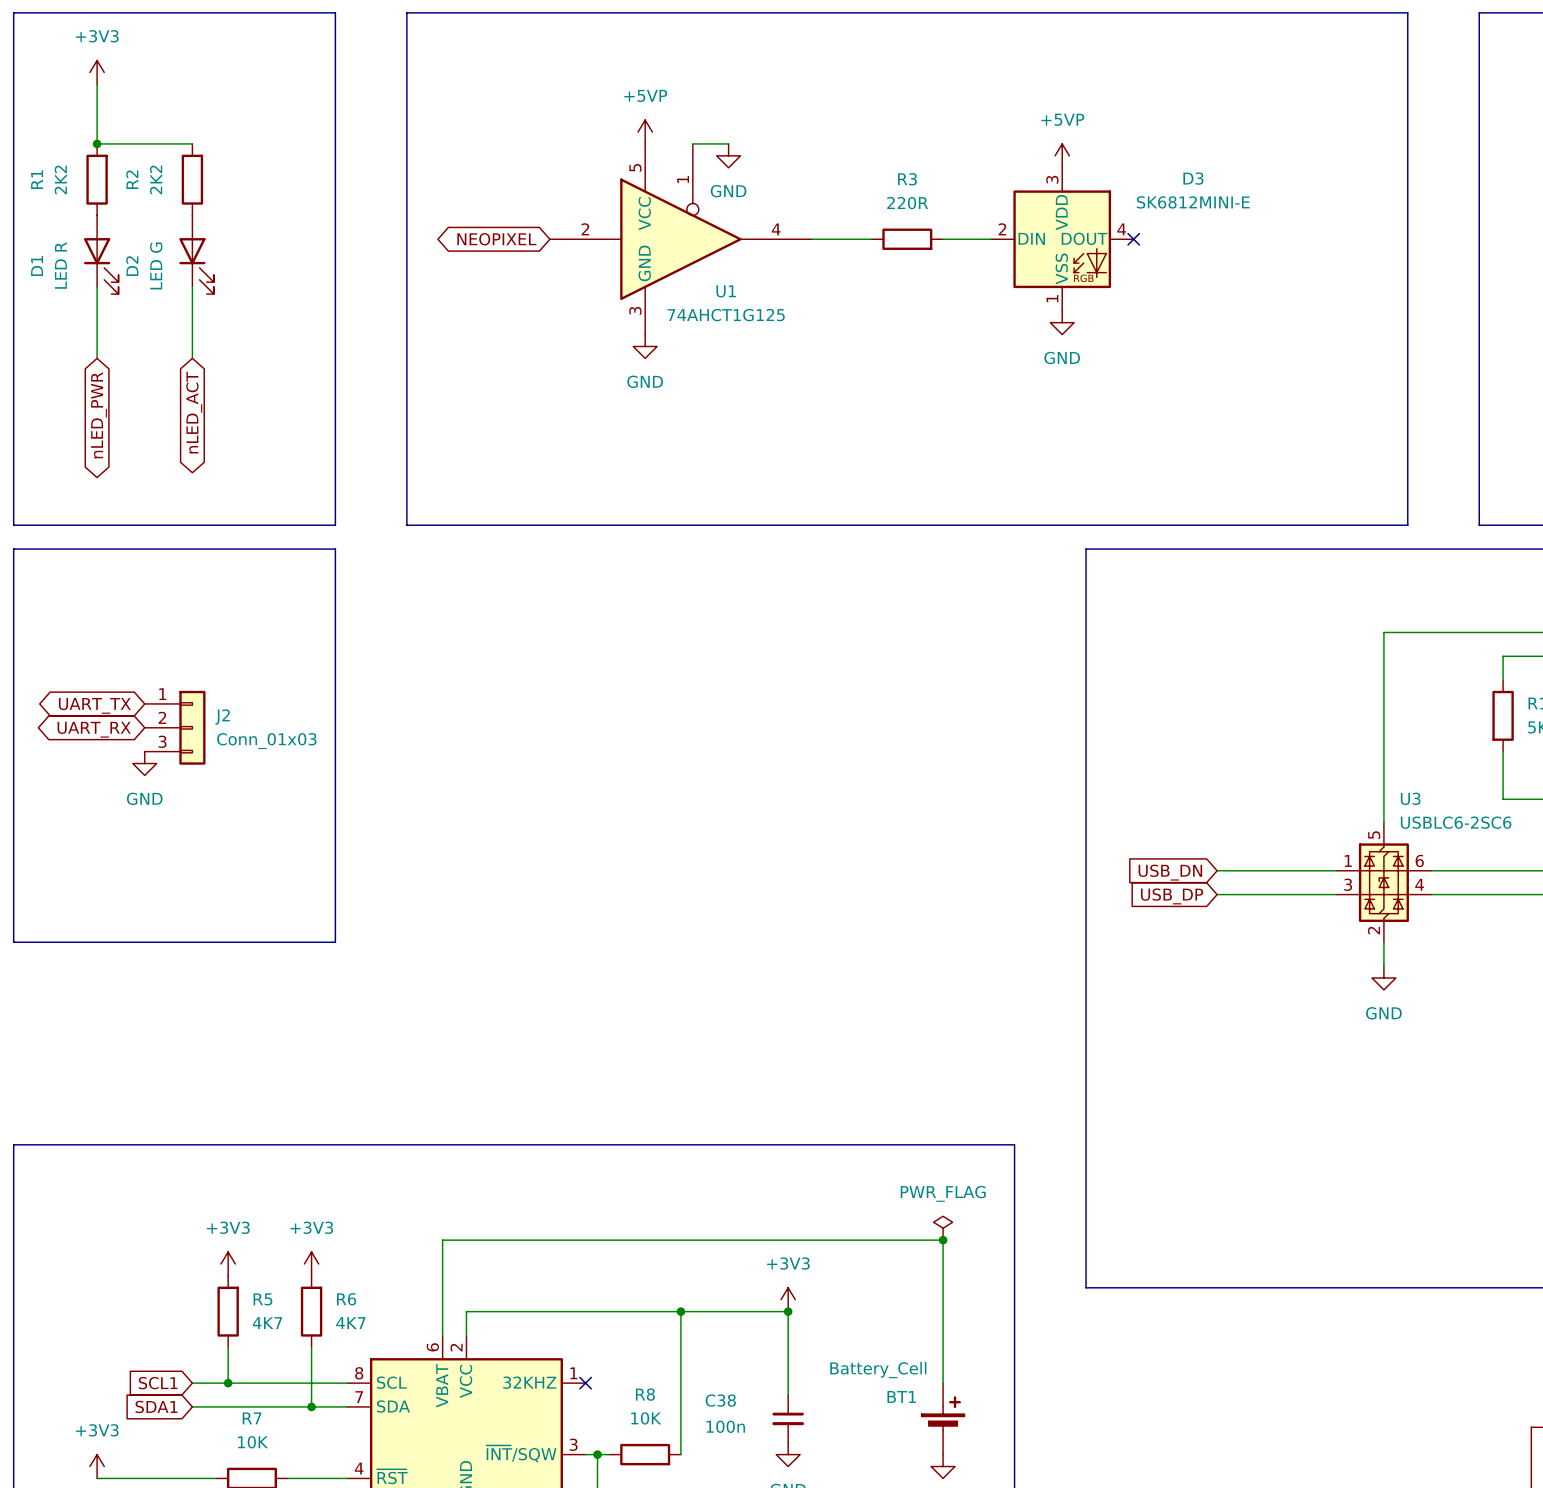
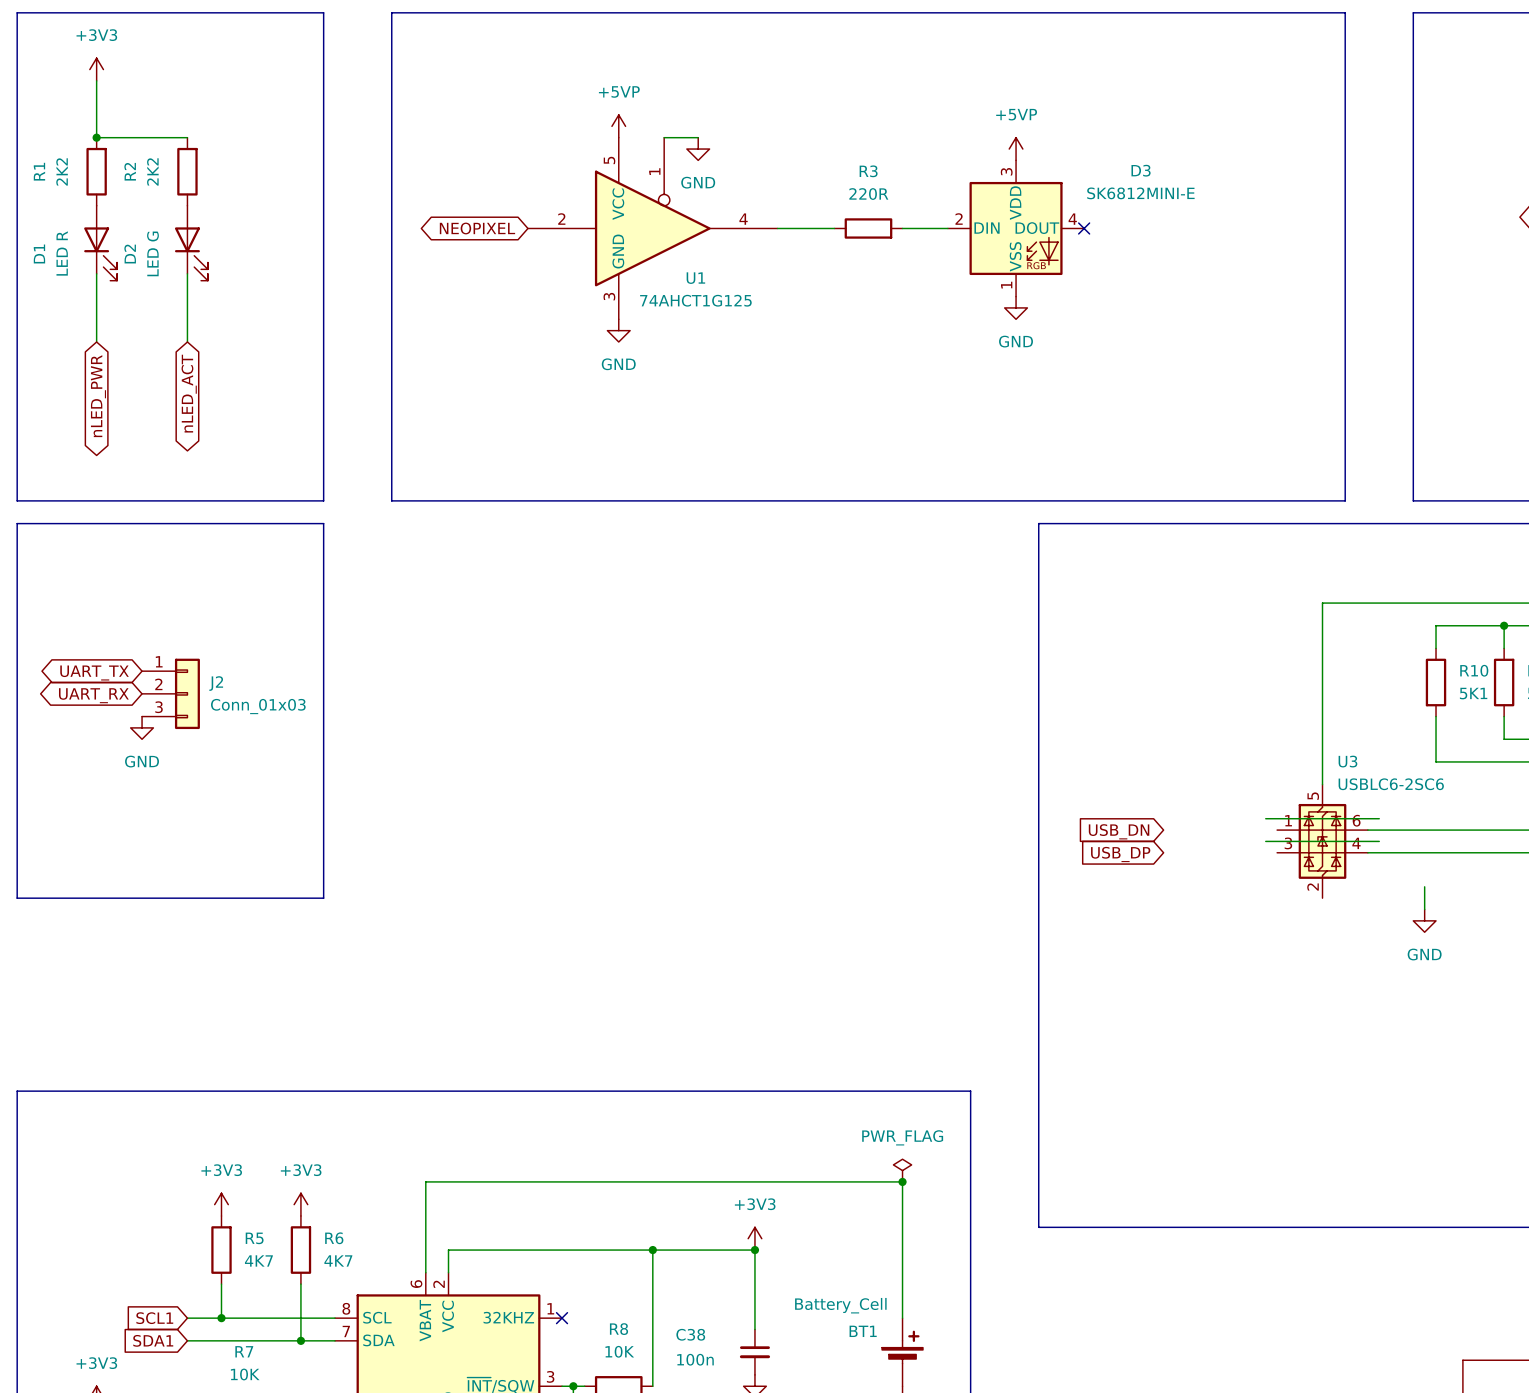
wire: (1217, 870) (1336, 870) -> (1265, 818) (1379, 818)
wire: (1217, 894) (1336, 894) -> (1265, 841) (1379, 841)
wire: (1383, 942) (1383, 966) -> (1424, 886) (1424, 909)
power symbol position: GND (1383, 978) -> GND (1424, 920)

